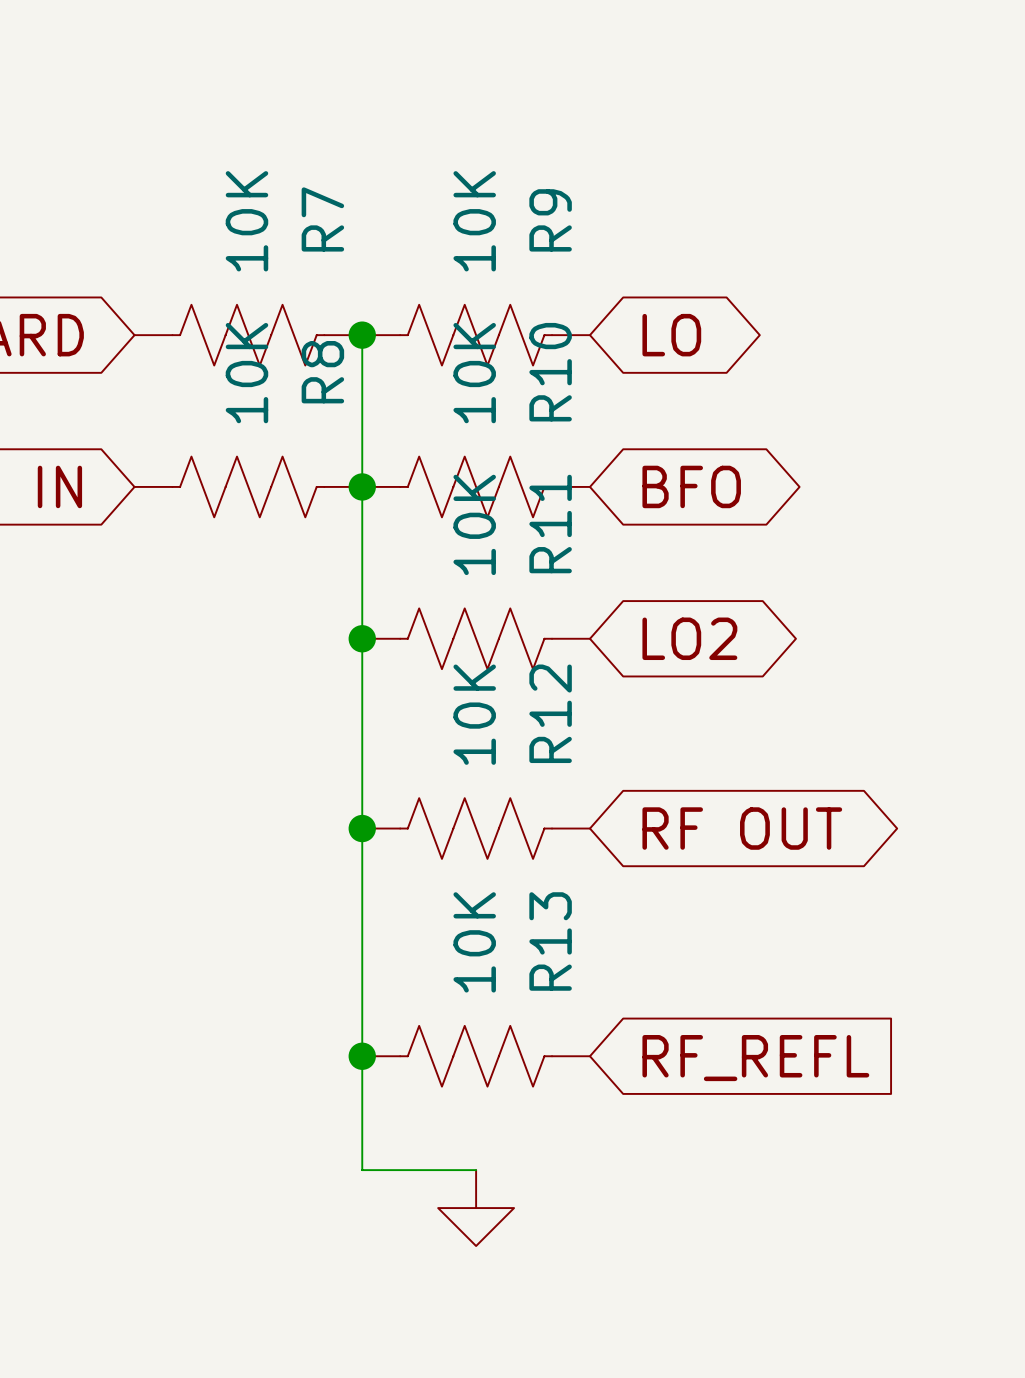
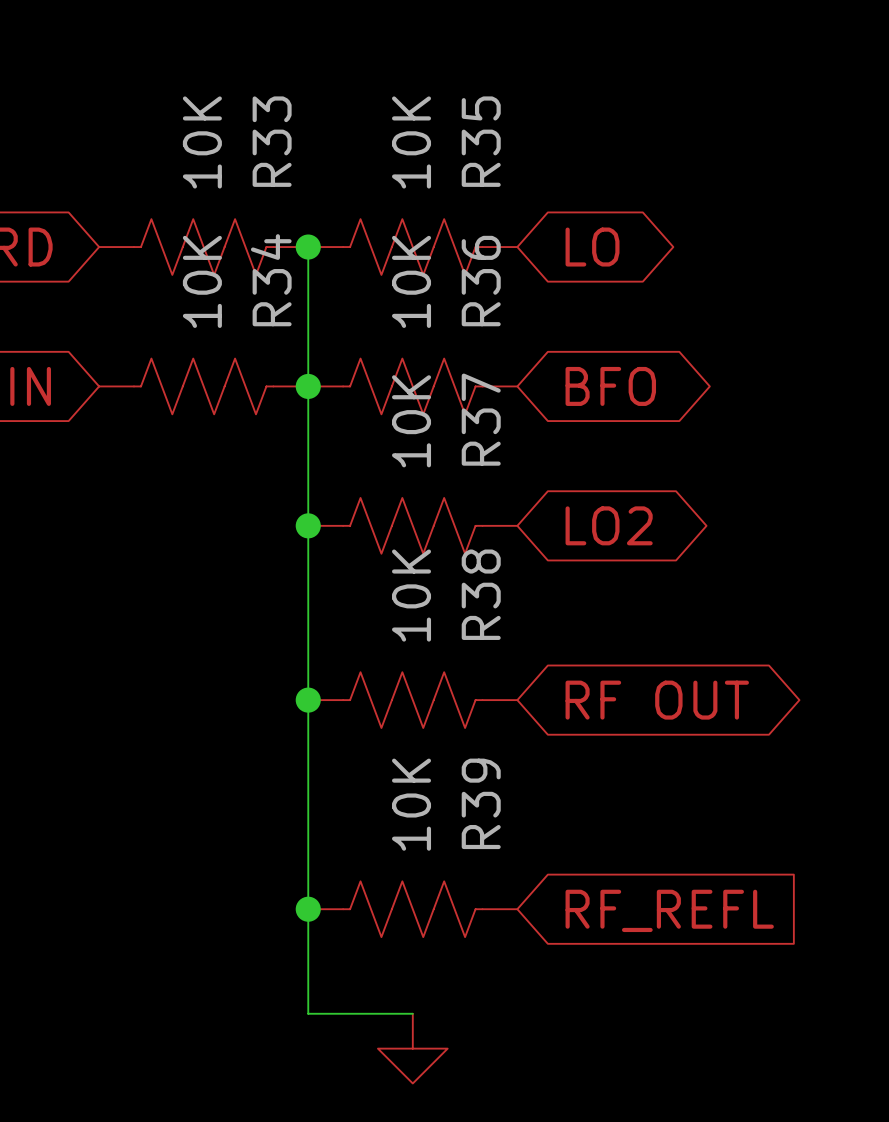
R7 name: R7 (322, 219) -> R33 (272, 141)
R9 name: R9 (550, 220) -> R35 (481, 141)
R8 name: R8 (322, 372) -> R34 (271, 280)
R10 name: R10 (550, 372) -> R36 (481, 281)
R11 name: R11 (550, 524) -> R37 (481, 419)
R12 name: R12 (550, 713) -> R38 (481, 594)
R13 name: R13 (550, 941) -> R39 (481, 803)

